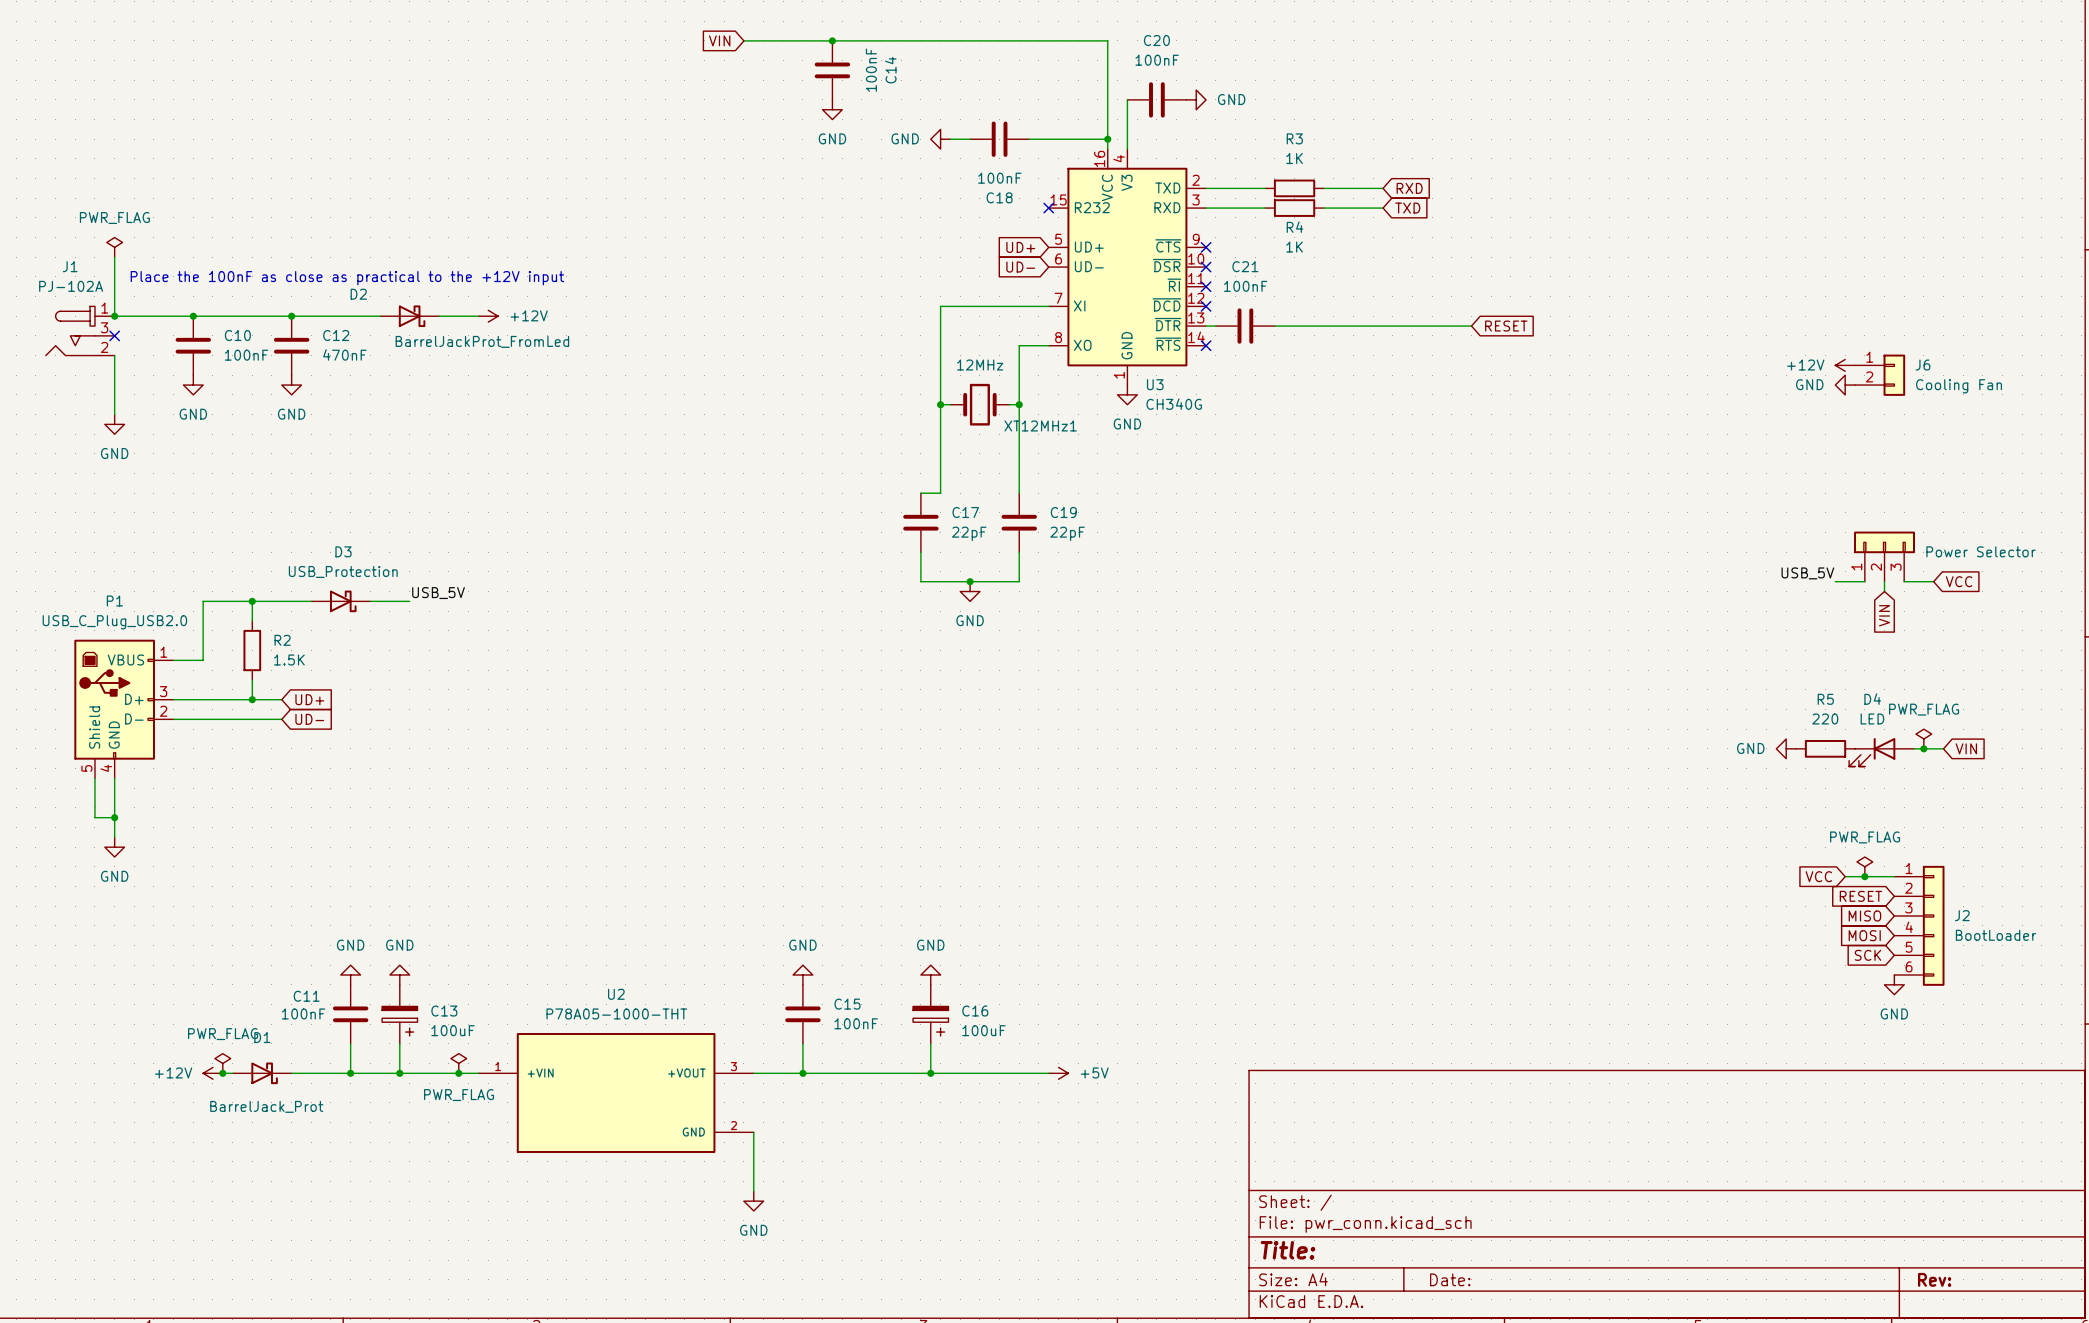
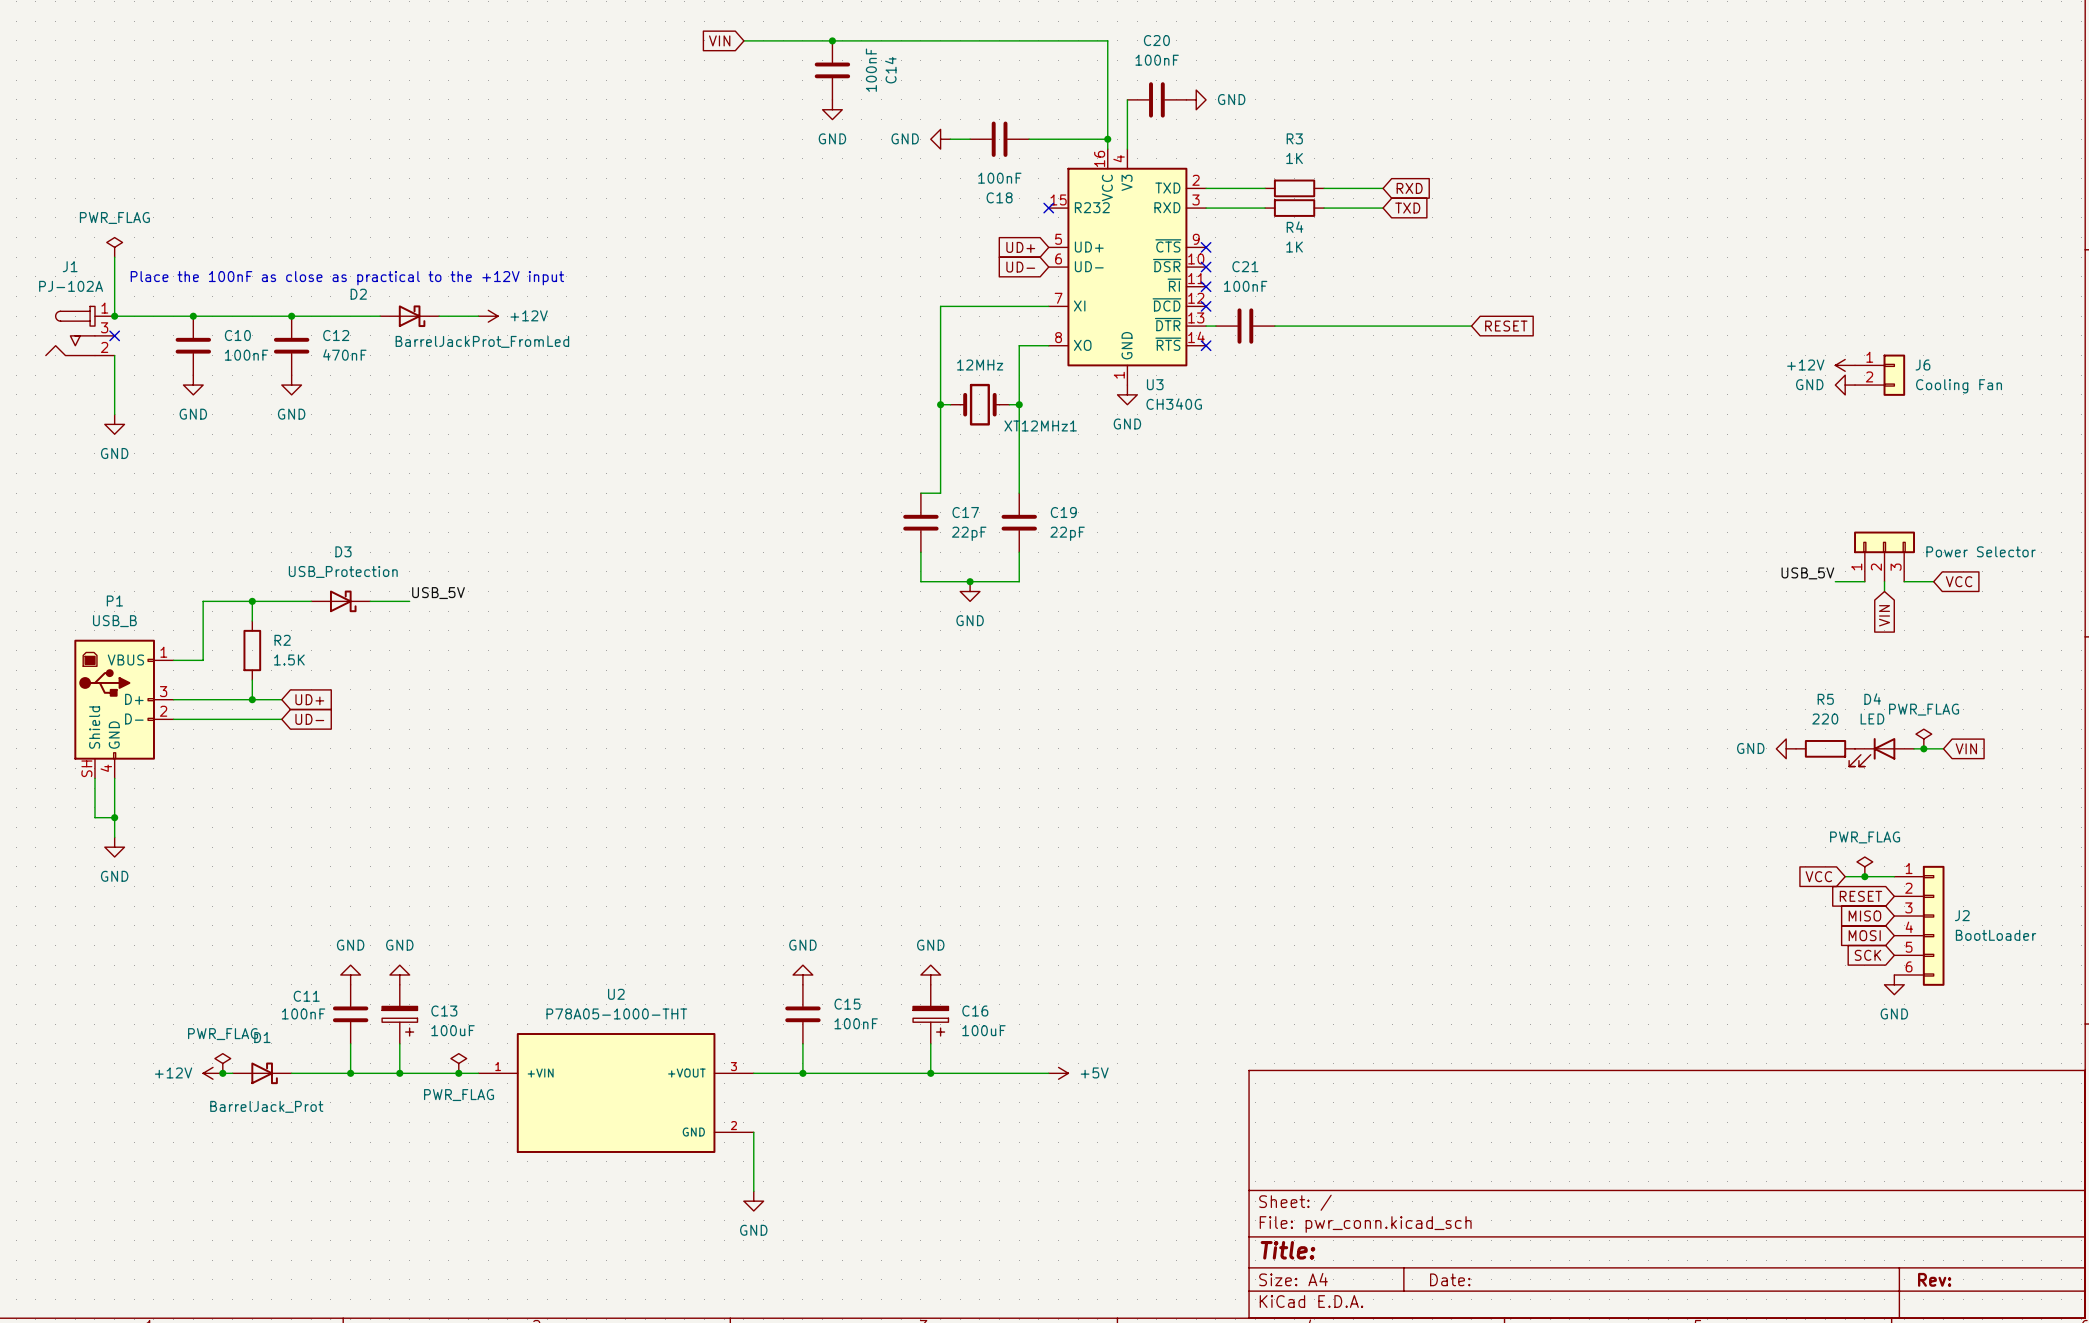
P1 value: USB_C_Plug_USB2.0 (114, 622) -> USB_B (114, 621)
P1 pin number: 5 (86, 768) -> SH (86, 768)

